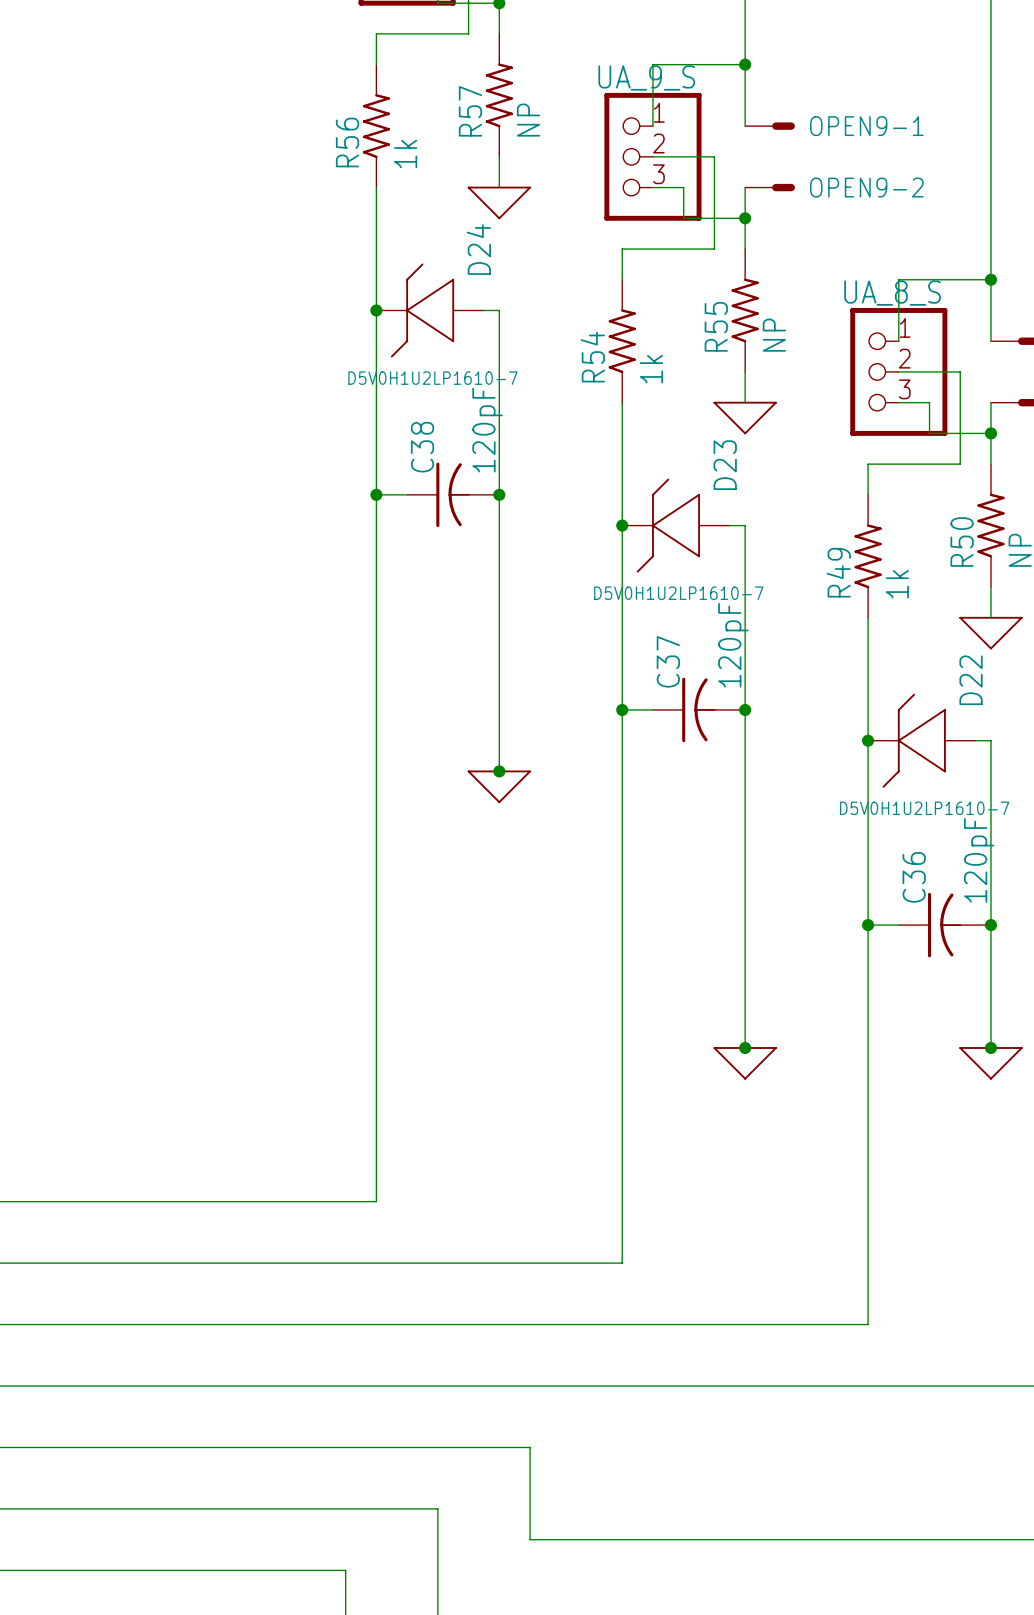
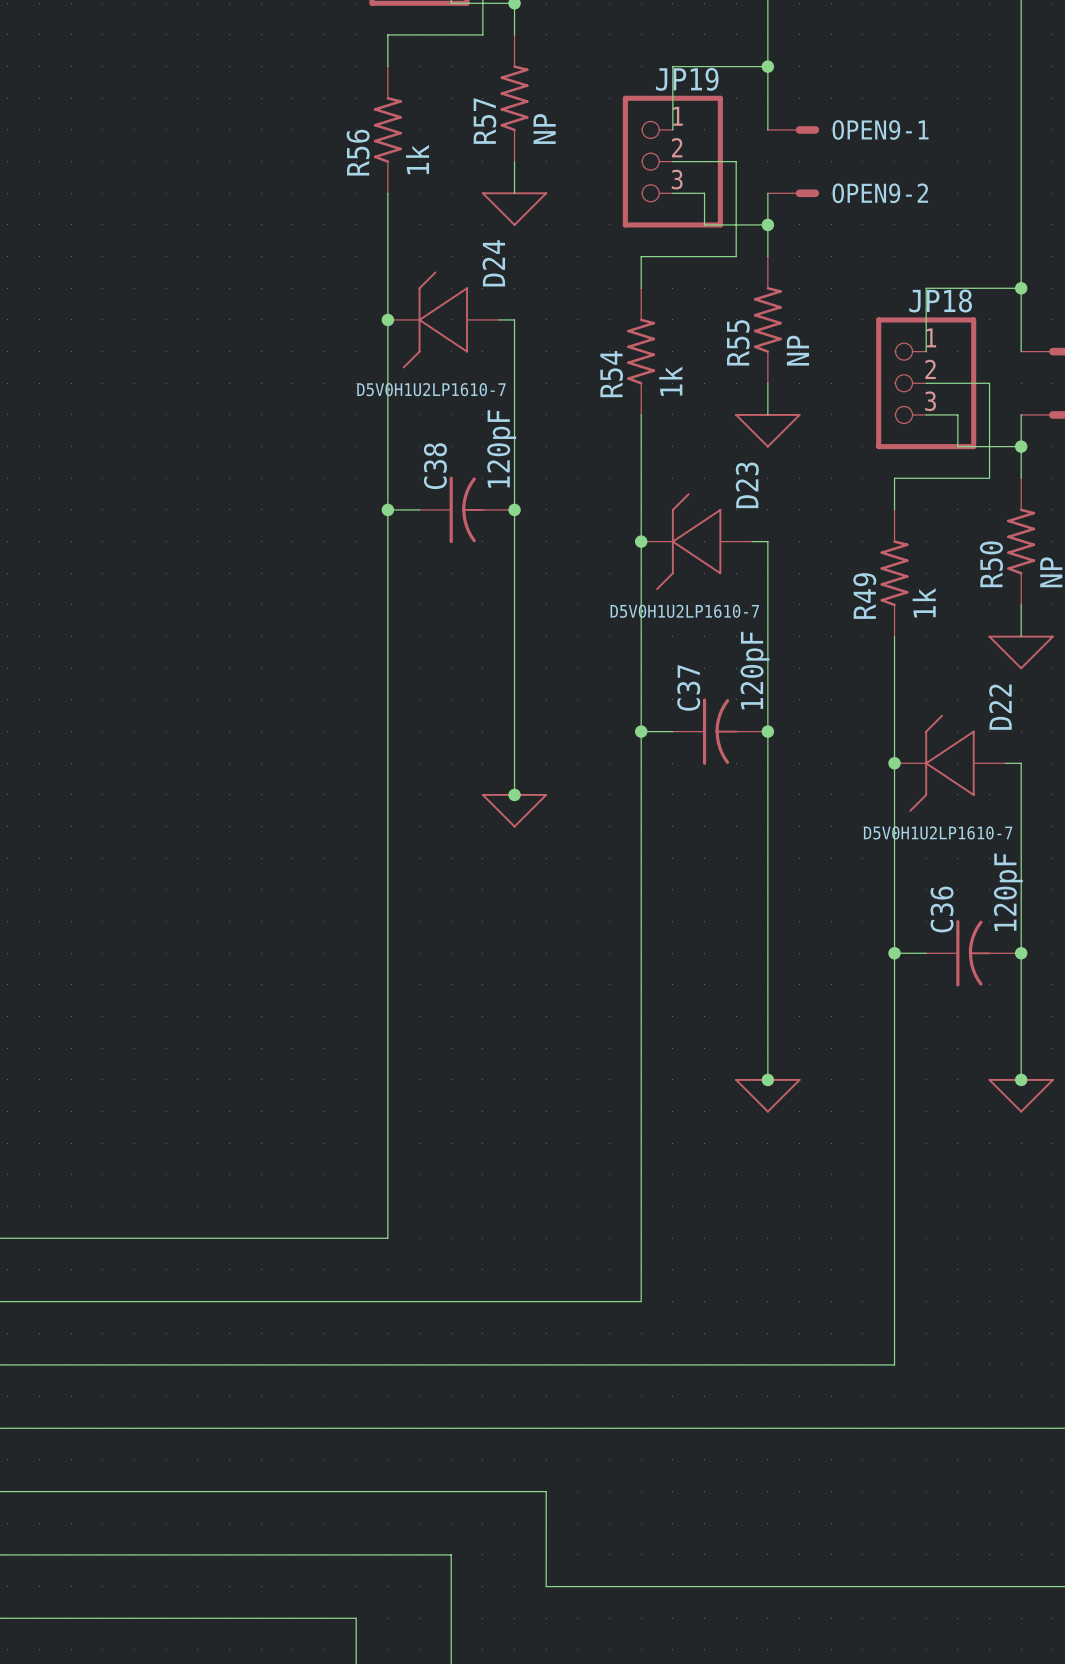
UA_9_S name: UA_9_S (646, 77) -> JP19 (687, 79)
UA_8_S name: UA_8_S (892, 293) -> JP18 (940, 300)

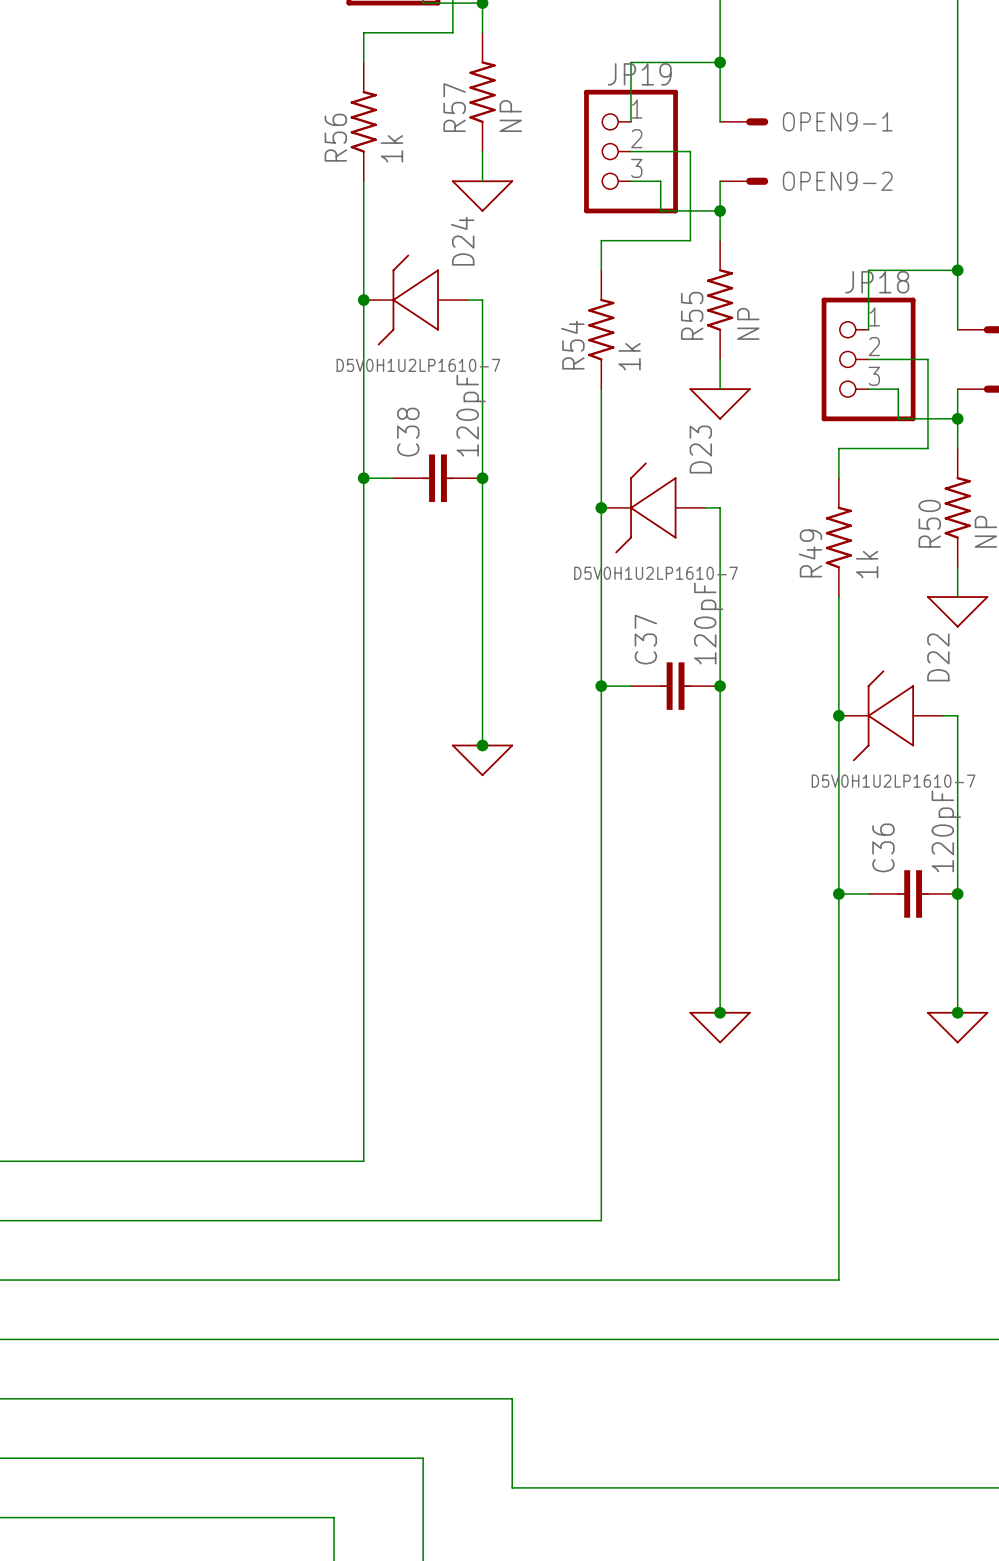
C38 symbol: [419, 476, 515, 544] -> [393, 454, 483, 502]
C37 symbol: [672, 698, 768, 765] -> [631, 662, 721, 710]
C36 symbol: [926, 920, 1022, 987] -> [868, 870, 958, 918]

